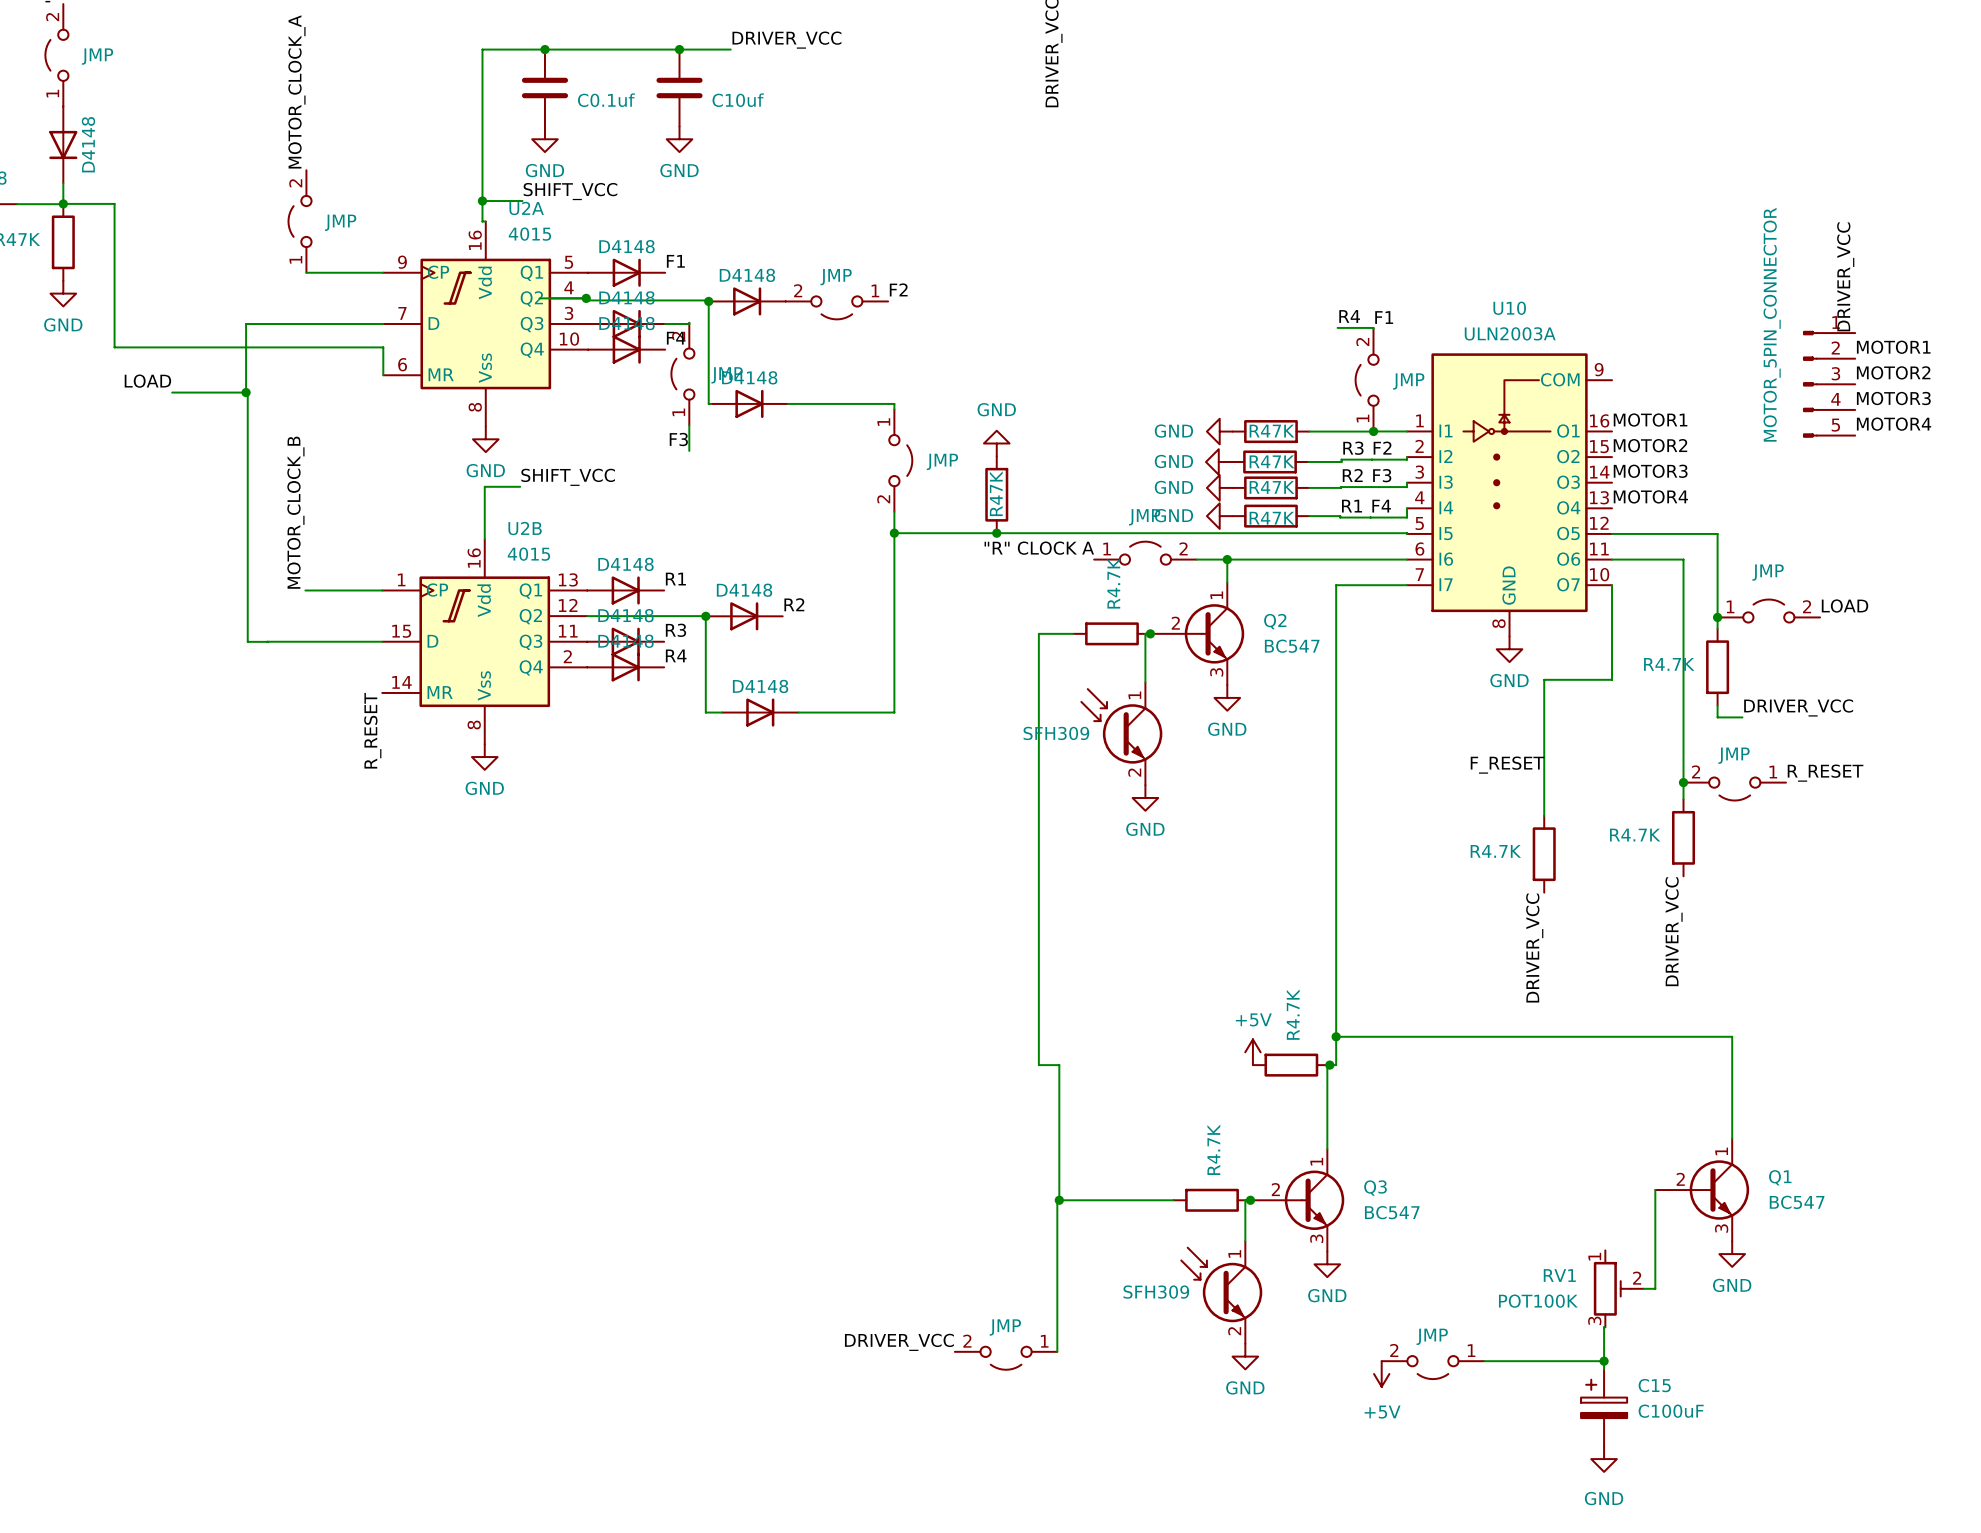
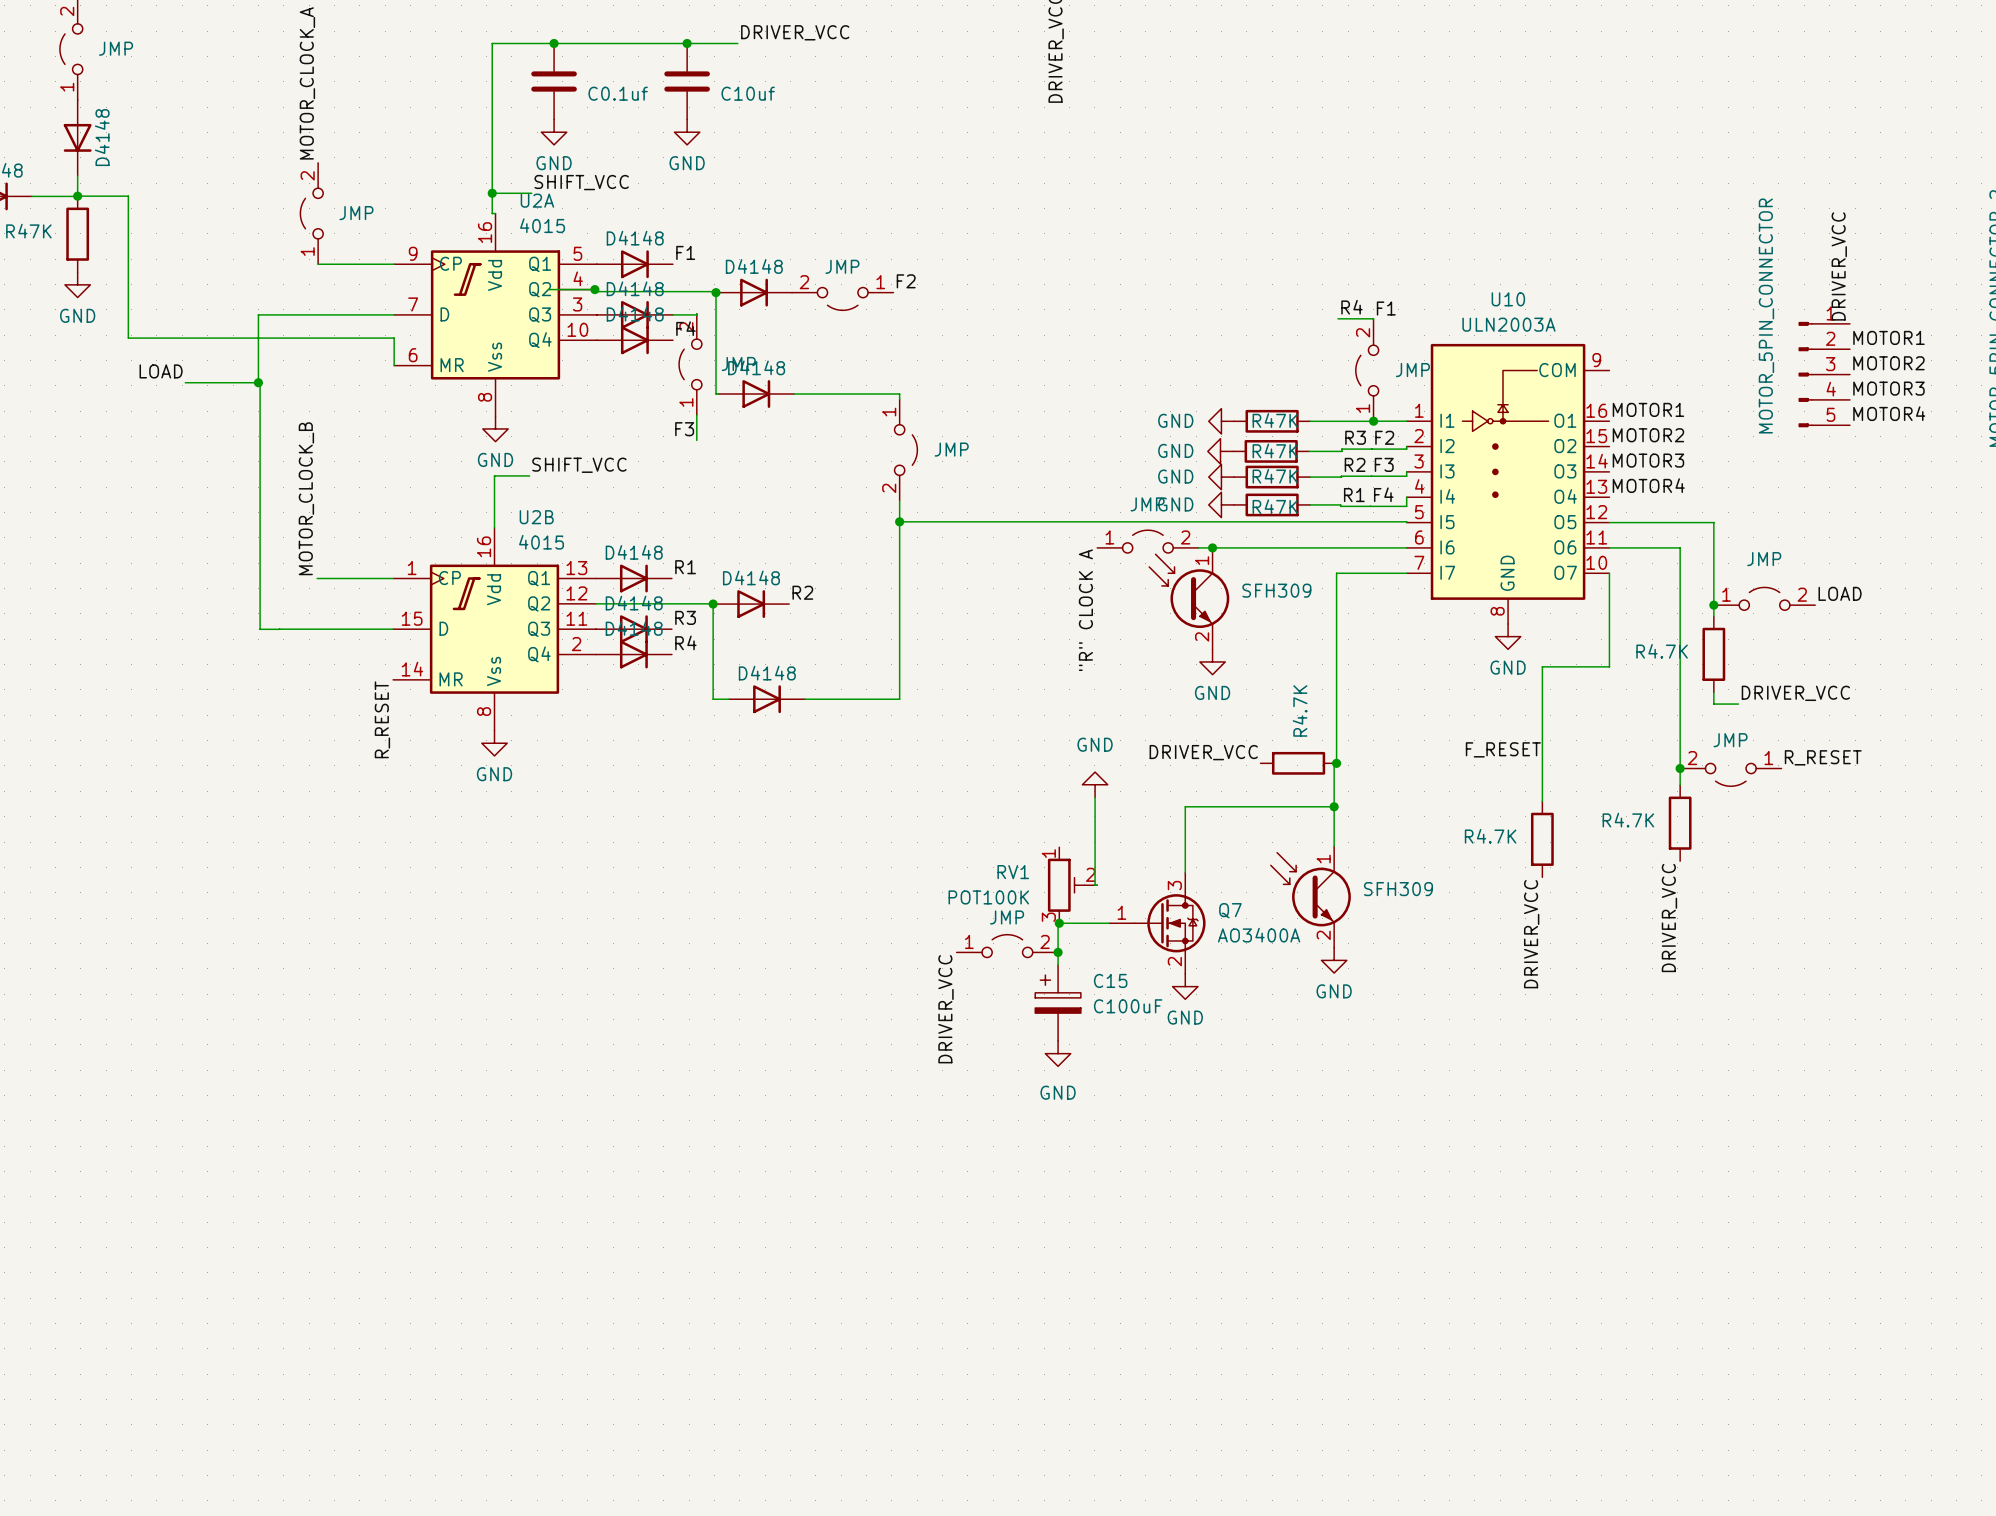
power symbol: GND (996, 443) -> none
part: R47K (996, 494) -> none
junction: (996, 533) -> none
label rotation: 0° (1039, 548) -> 90° counterclockwise (1085, 610)
wire: (1227, 559) (1227, 582) -> none
junction position: (1227, 559) -> (1212, 547)
part: none -> SFH309 (1189, 598)
wire: (1073, 633) (1038, 633) (1038, 1065) (1059, 1065) (1059, 1200) -> none
part: R4.7K (1111, 633) -> none
wire: (1150, 633) (1145, 633) (1145, 682) -> none
junction: (1150, 633) -> none
Q2: BC547 (1197, 633) -> none
power symbol position: GND (1227, 697) -> GND (1212, 661)
part: SFH309 (1121, 733) -> none
label: none -> DRIVER_VCC (1203, 752)
part: none -> R4.7K (1298, 763)
wire: (1336, 777) (1336, 1065) (1327, 1065) (1327, 1149) -> (1336, 763) (1334, 763) (1334, 846)
junction: none -> (1336, 763)
power symbol rotation: 0° (1145, 797) -> 180° (1095, 784)
power symbol position: GND (1145, 797) -> GND (1095, 784)
wire: none -> (1095, 797) (1095, 885) (1097, 885)
wire: none -> (1334, 806) (1185, 806) (1185, 872)
junction: none -> (1334, 806)
part: none -> SFH309 (1310, 897)
junction: none -> (1059, 923)
wire: none -> (1109, 923) (1058, 923) (1058, 964)
Q7: none -> AO3400A (1157, 923)
part: none -> JMP (1007, 946)
junction: none -> (1058, 952)
power symbol: none -> GND (1334, 960)
power symbol: none -> GND (1185, 986)
label: none -> DRIVER_VCC (945, 1009)
wire: (1336, 1036) (1732, 1036) (1732, 1138) -> none
junction: (1336, 1036) -> none
power symbol: +5V (1252, 1052) -> none
part: R4.7K (1291, 1065) -> none
junction: (1329, 1065) -> none
power symbol: none -> GND (1058, 1053)
wire: (1655, 1190) (1655, 1288) (1643, 1288) -> none
Q1: BC547 (1702, 1190) -> none
junction: (1059, 1200) -> none
wire: (1173, 1200) (1057, 1200) (1057, 1351) -> none
part: R4.7K (1212, 1200) -> none
wire: (1250, 1200) (1245, 1200) (1245, 1241) -> none
junction: (1250, 1200) -> none
Q3: BC547 (1297, 1200) -> none
power symbol: GND (1732, 1254) -> none
power symbol: GND (1327, 1264) -> none
RV1 position: (1618, 1288) -> (1072, 885)
part: SFH309 (1221, 1292) -> none
wire: (1605, 1327) (1604, 1369) -> none
label: DRIVER_VCC (899, 1342) -> none
power symbol: GND (1245, 1356) -> none
part: JMP (1006, 1358) -> none
wire: (1484, 1361) (1604, 1361) -> none
junction: (1604, 1361) -> none
part: JMP (1432, 1367) -> none
power symbol: +5V (1381, 1373) -> none
C15 position: (1604, 1407) -> (1058, 1002)
power symbol: GND (1604, 1459) -> none

